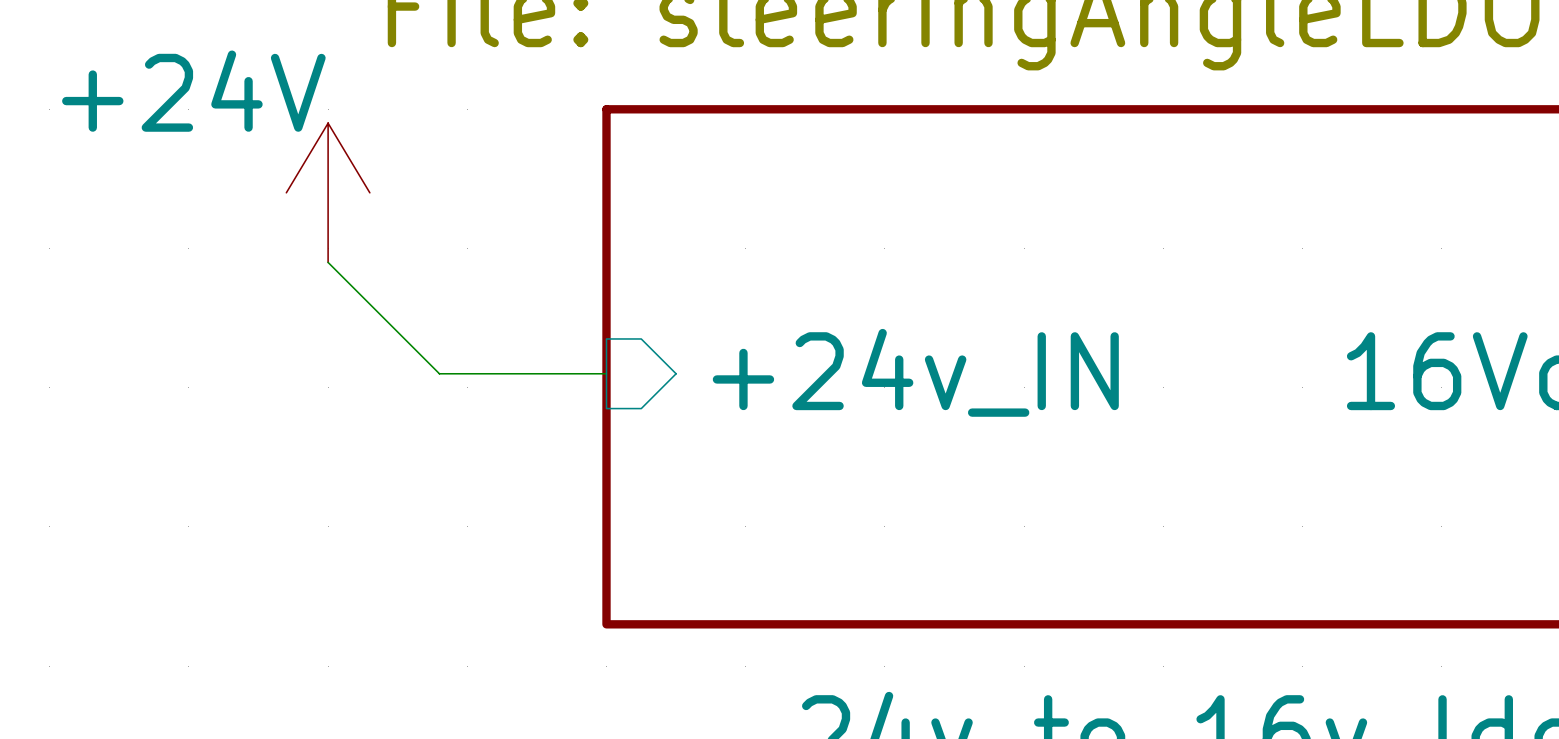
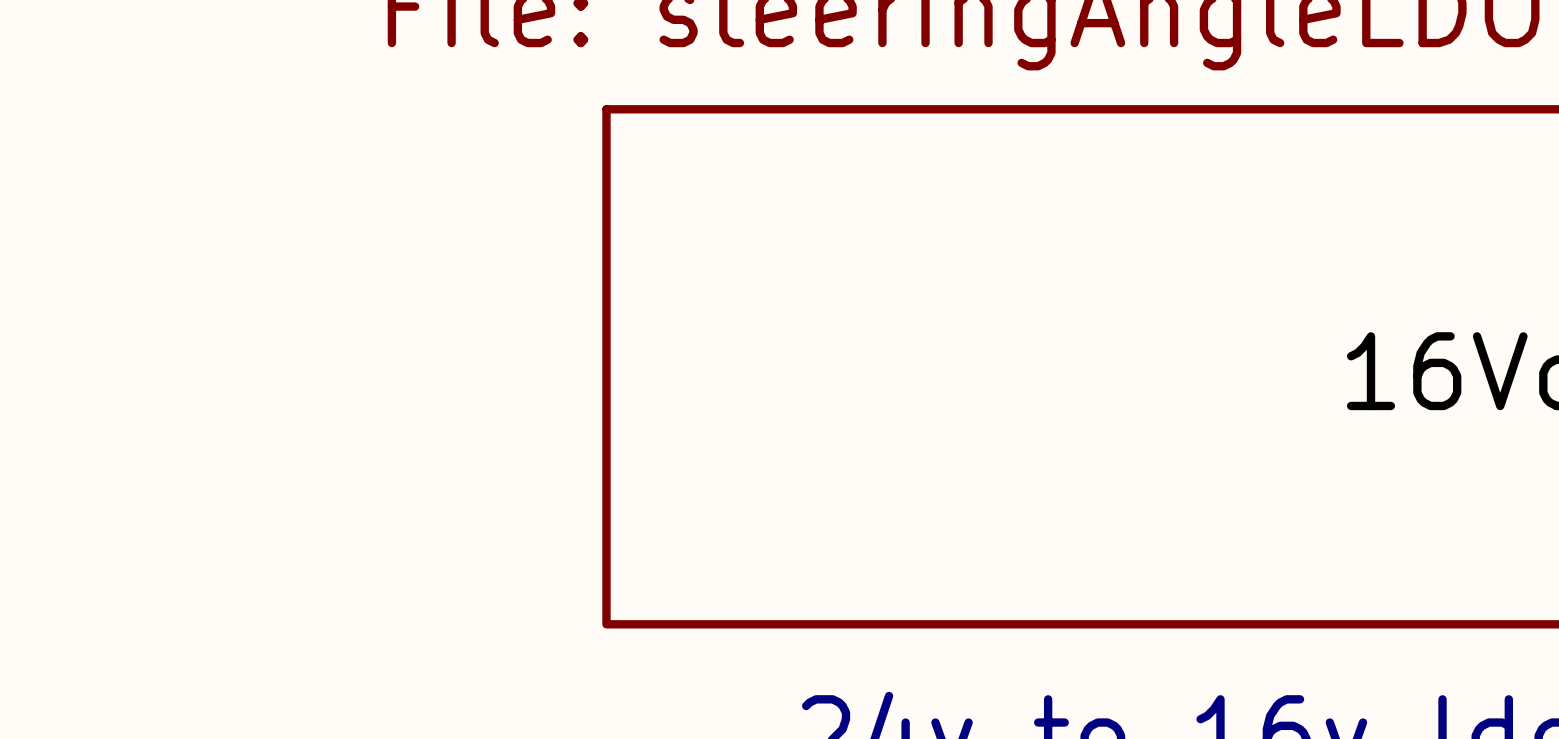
power symbol: +24V (328, 192) -> none
wire: (328, 262) (439, 373) (606, 373) -> none
sheet pin: +24v_IN (915, 372) -> none

